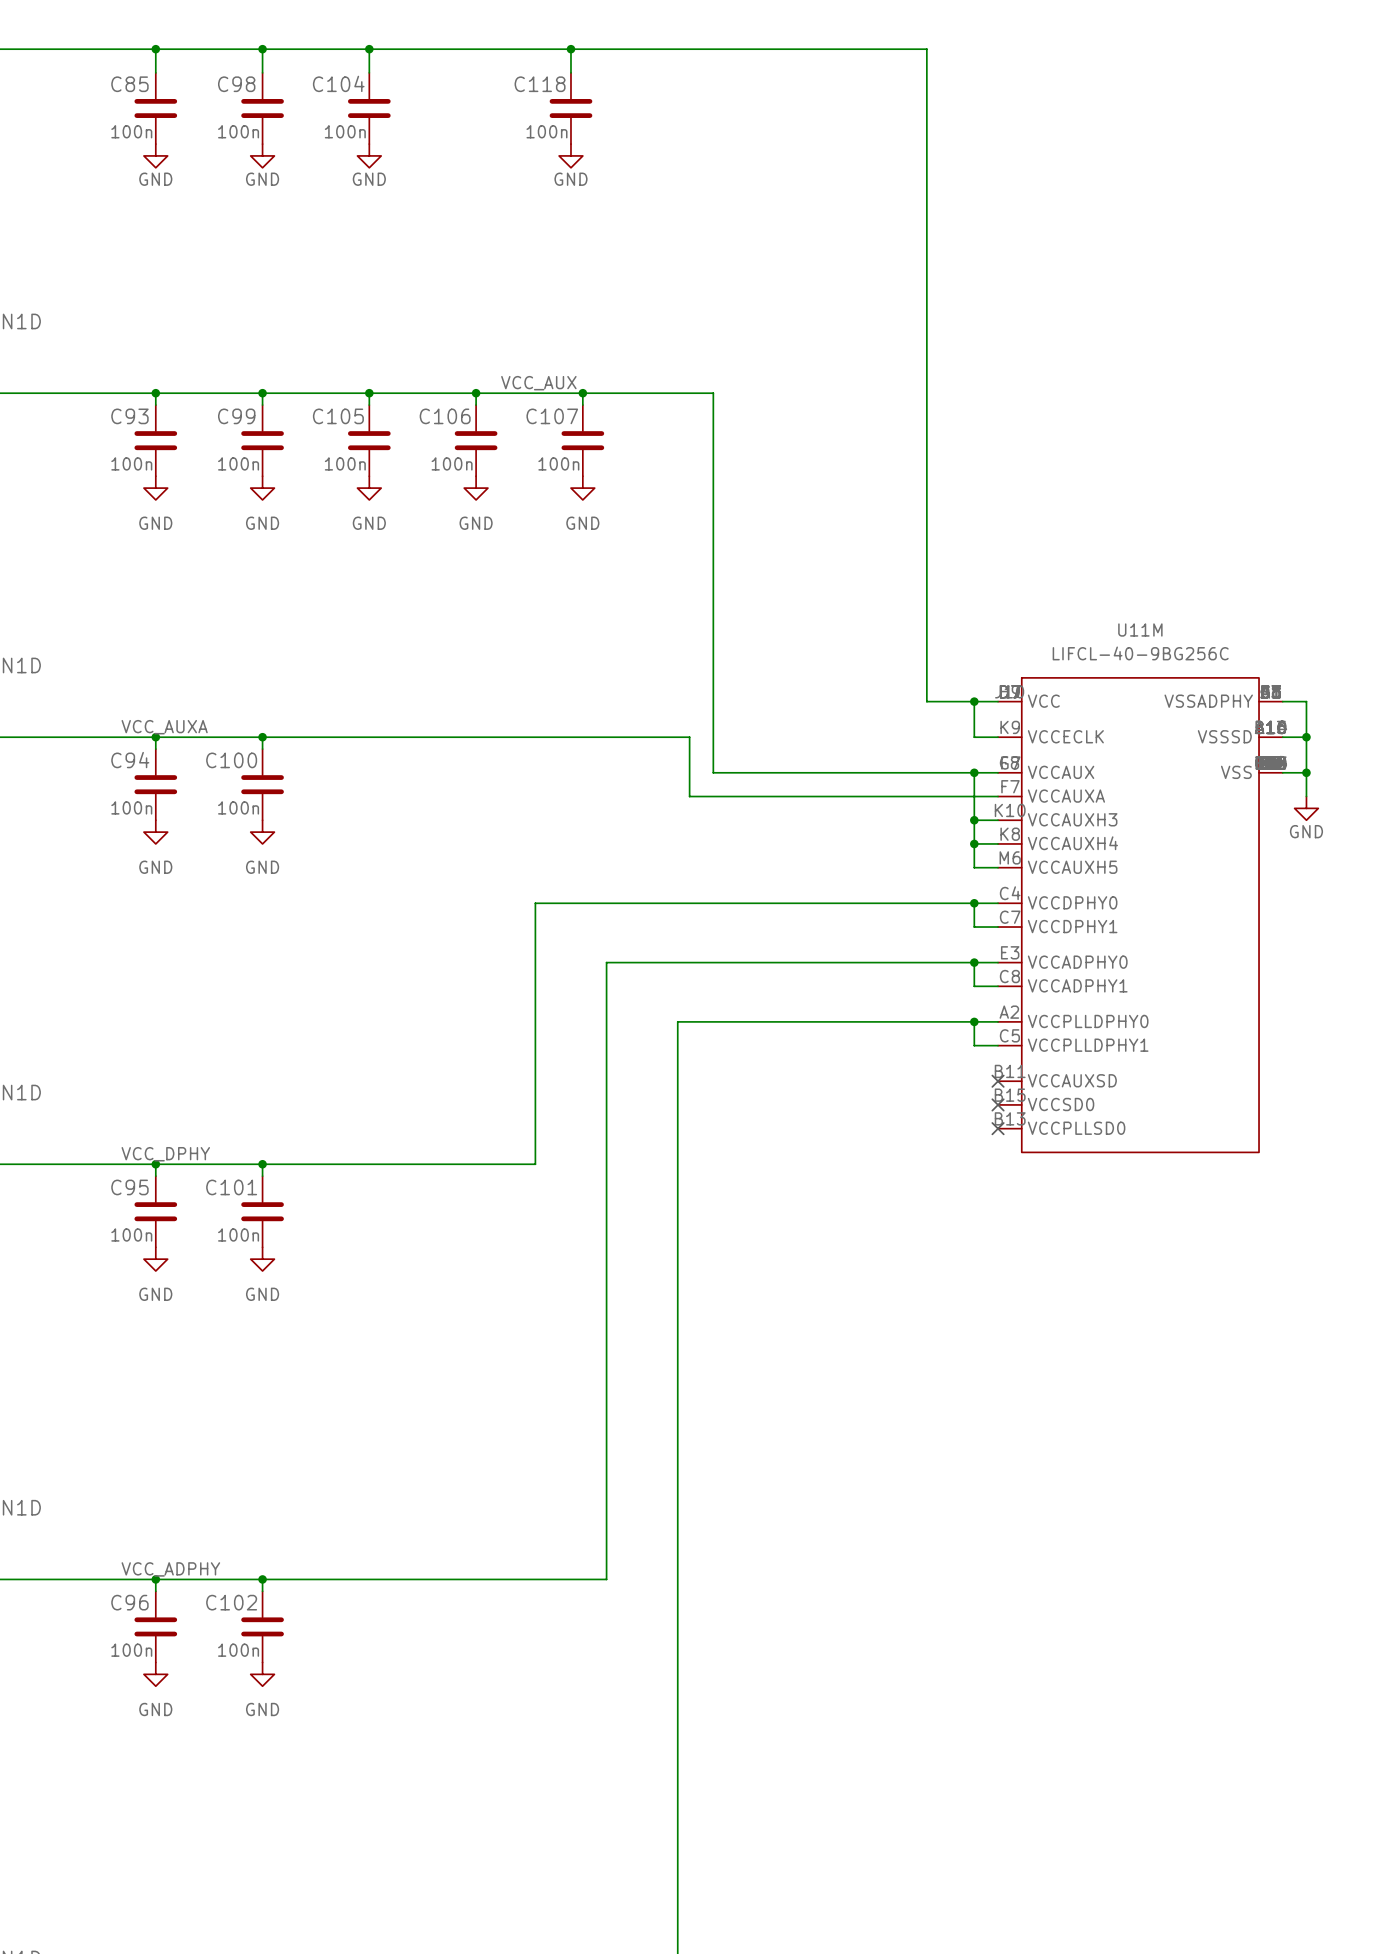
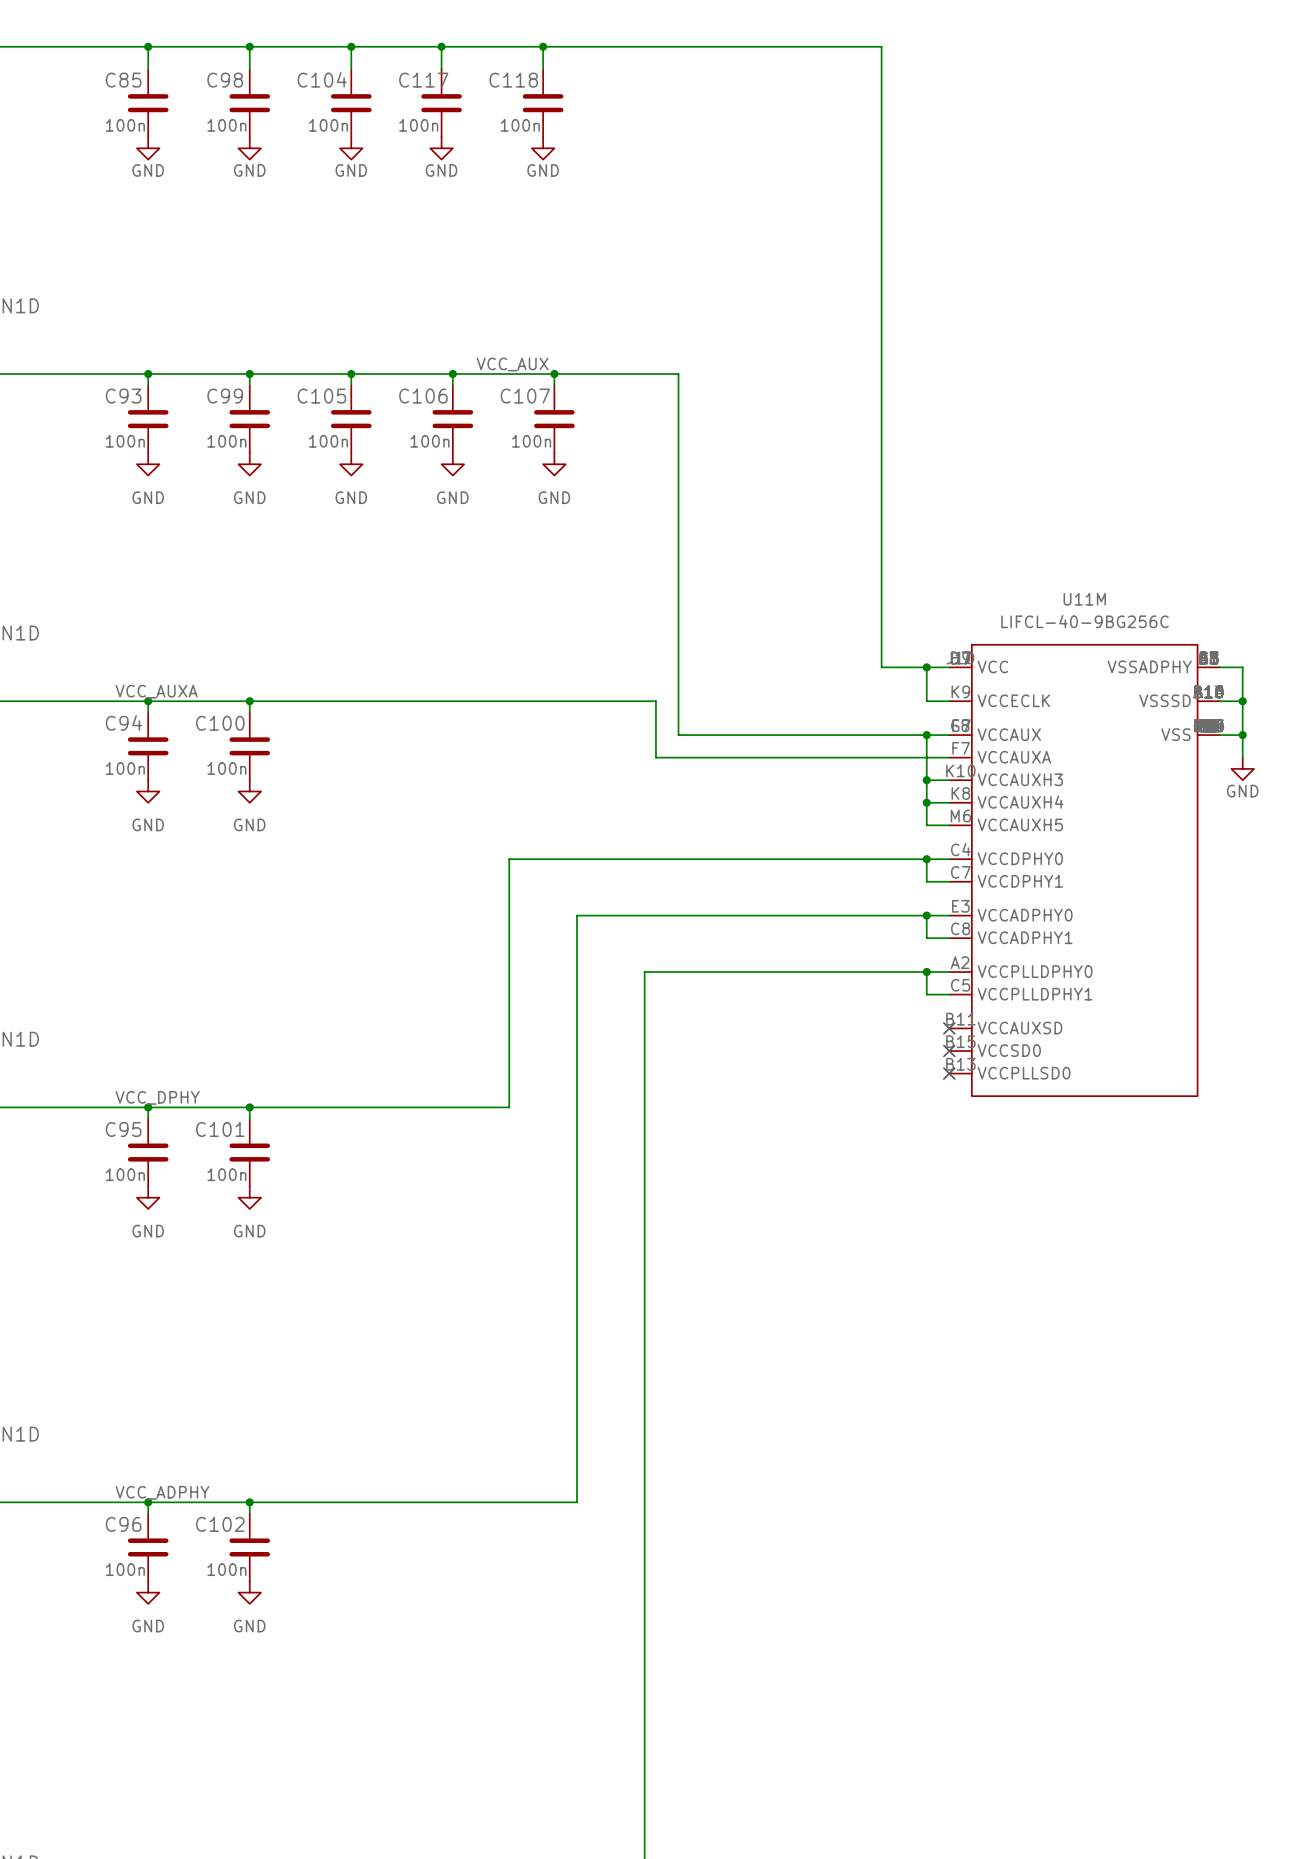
wire: none -> (441, 46) (441, 69)
junction: none -> (441, 46)
C117: none -> (441, 103)
power symbol: none -> GND (441, 148)

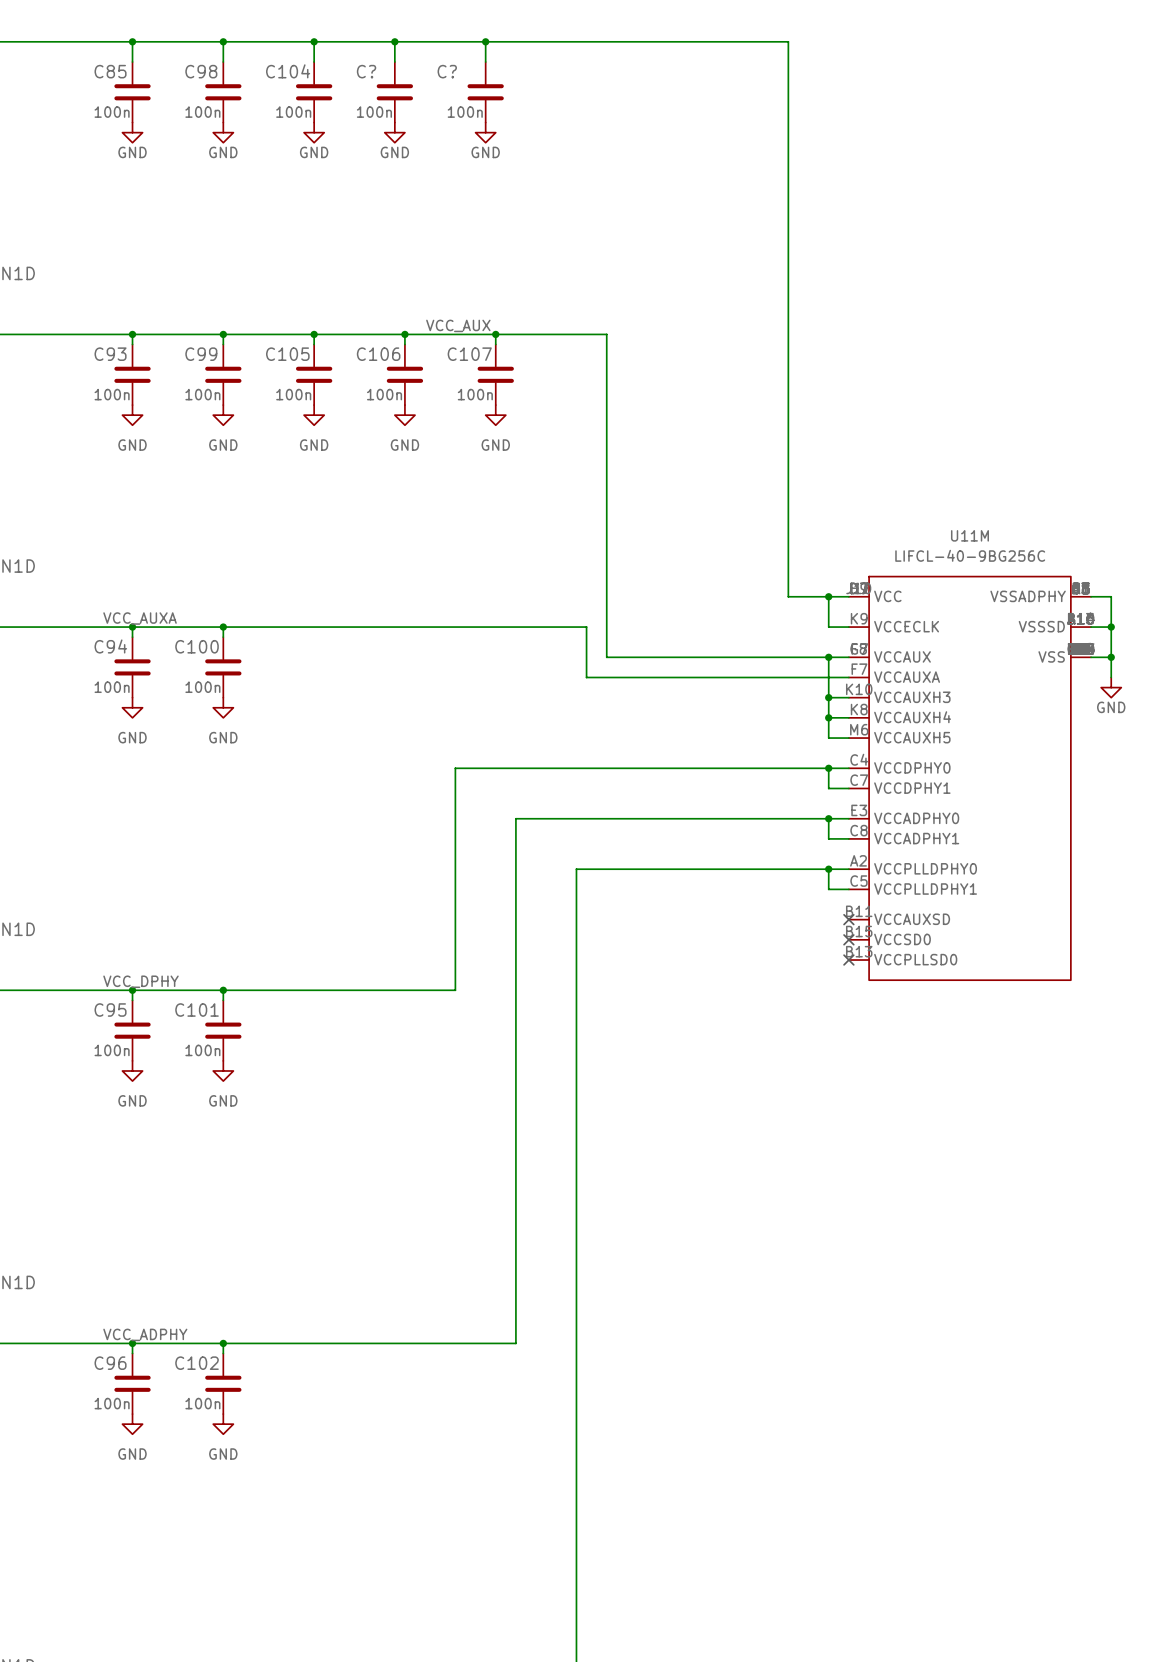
C117 name: C117 (423, 80) -> C? (366, 71)
C118 name: C118 (513, 80) -> C? (447, 71)

